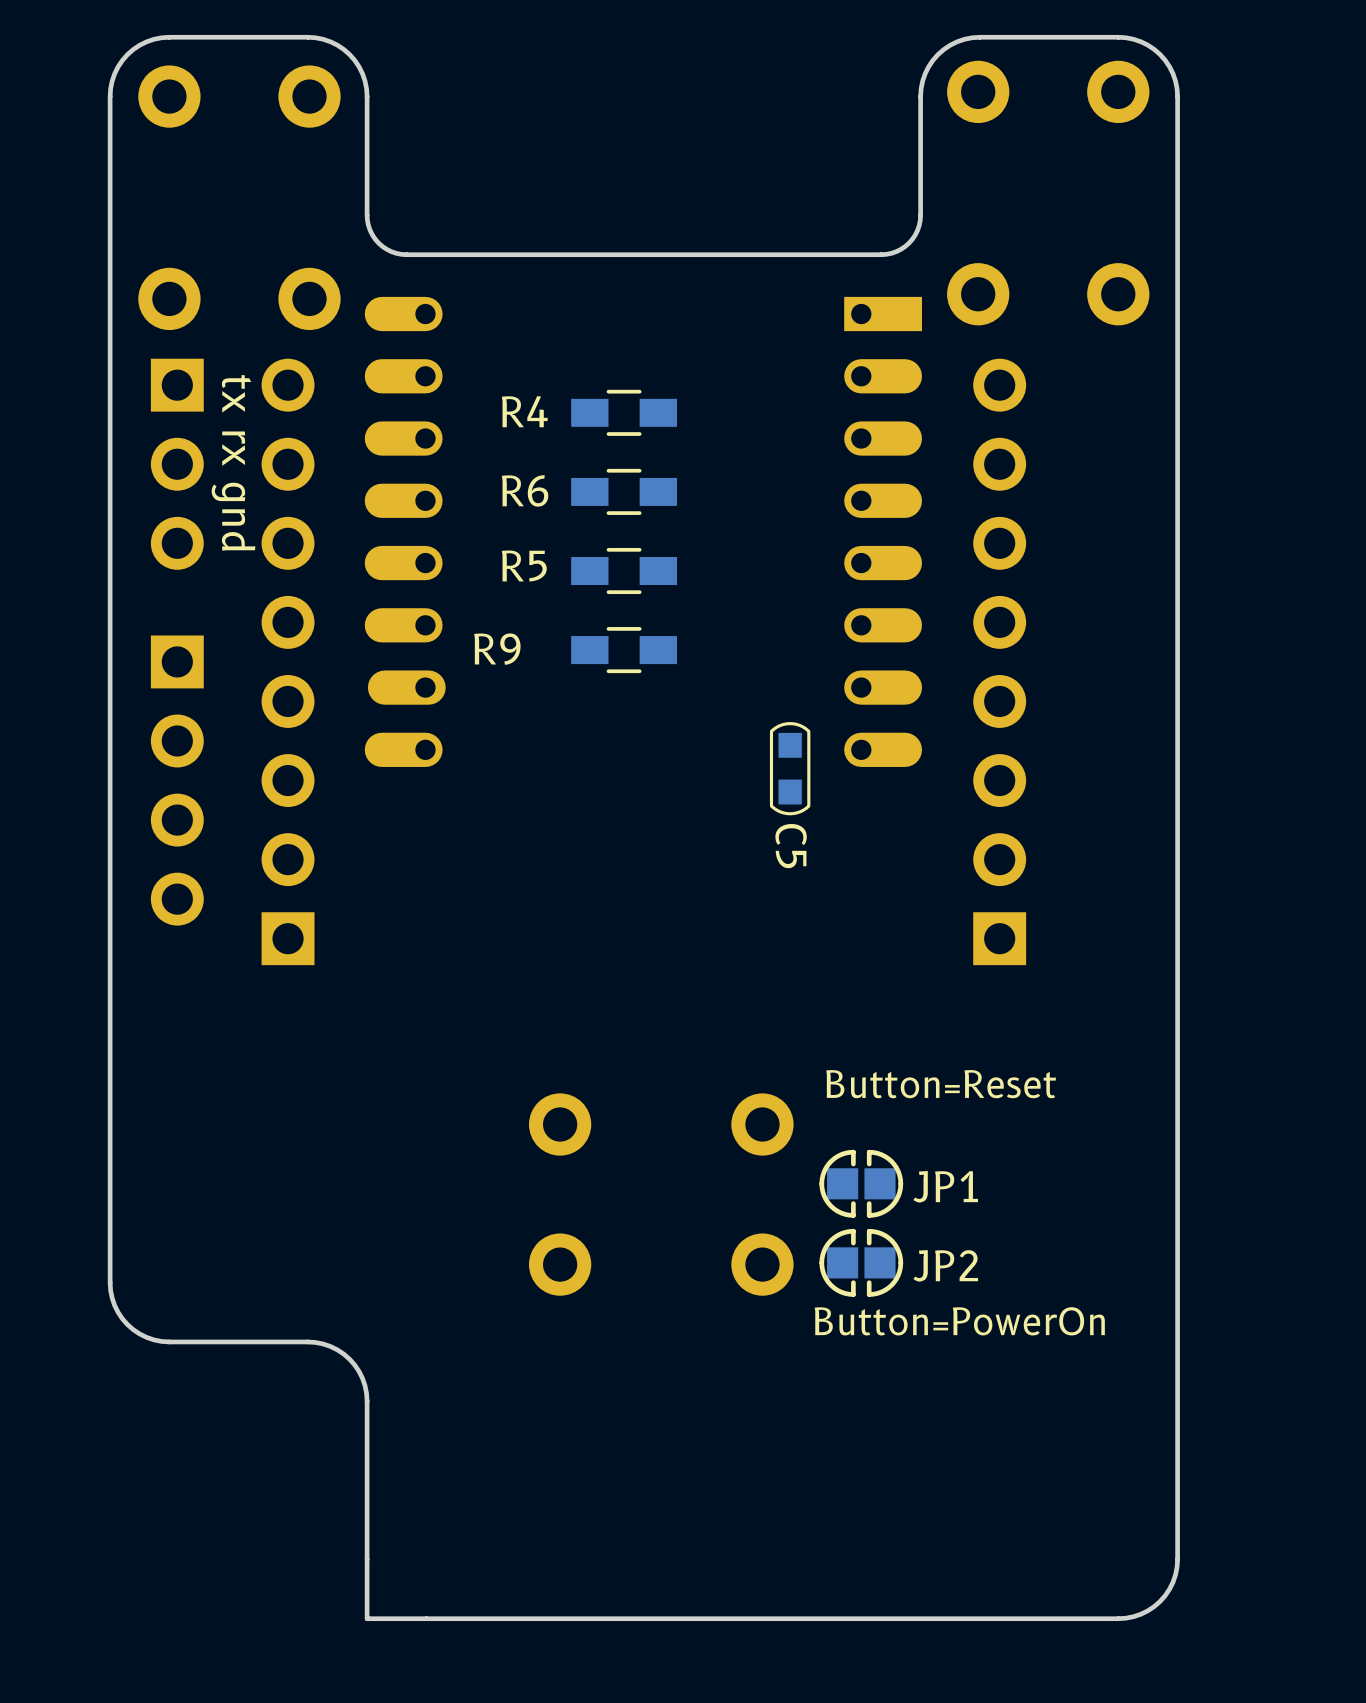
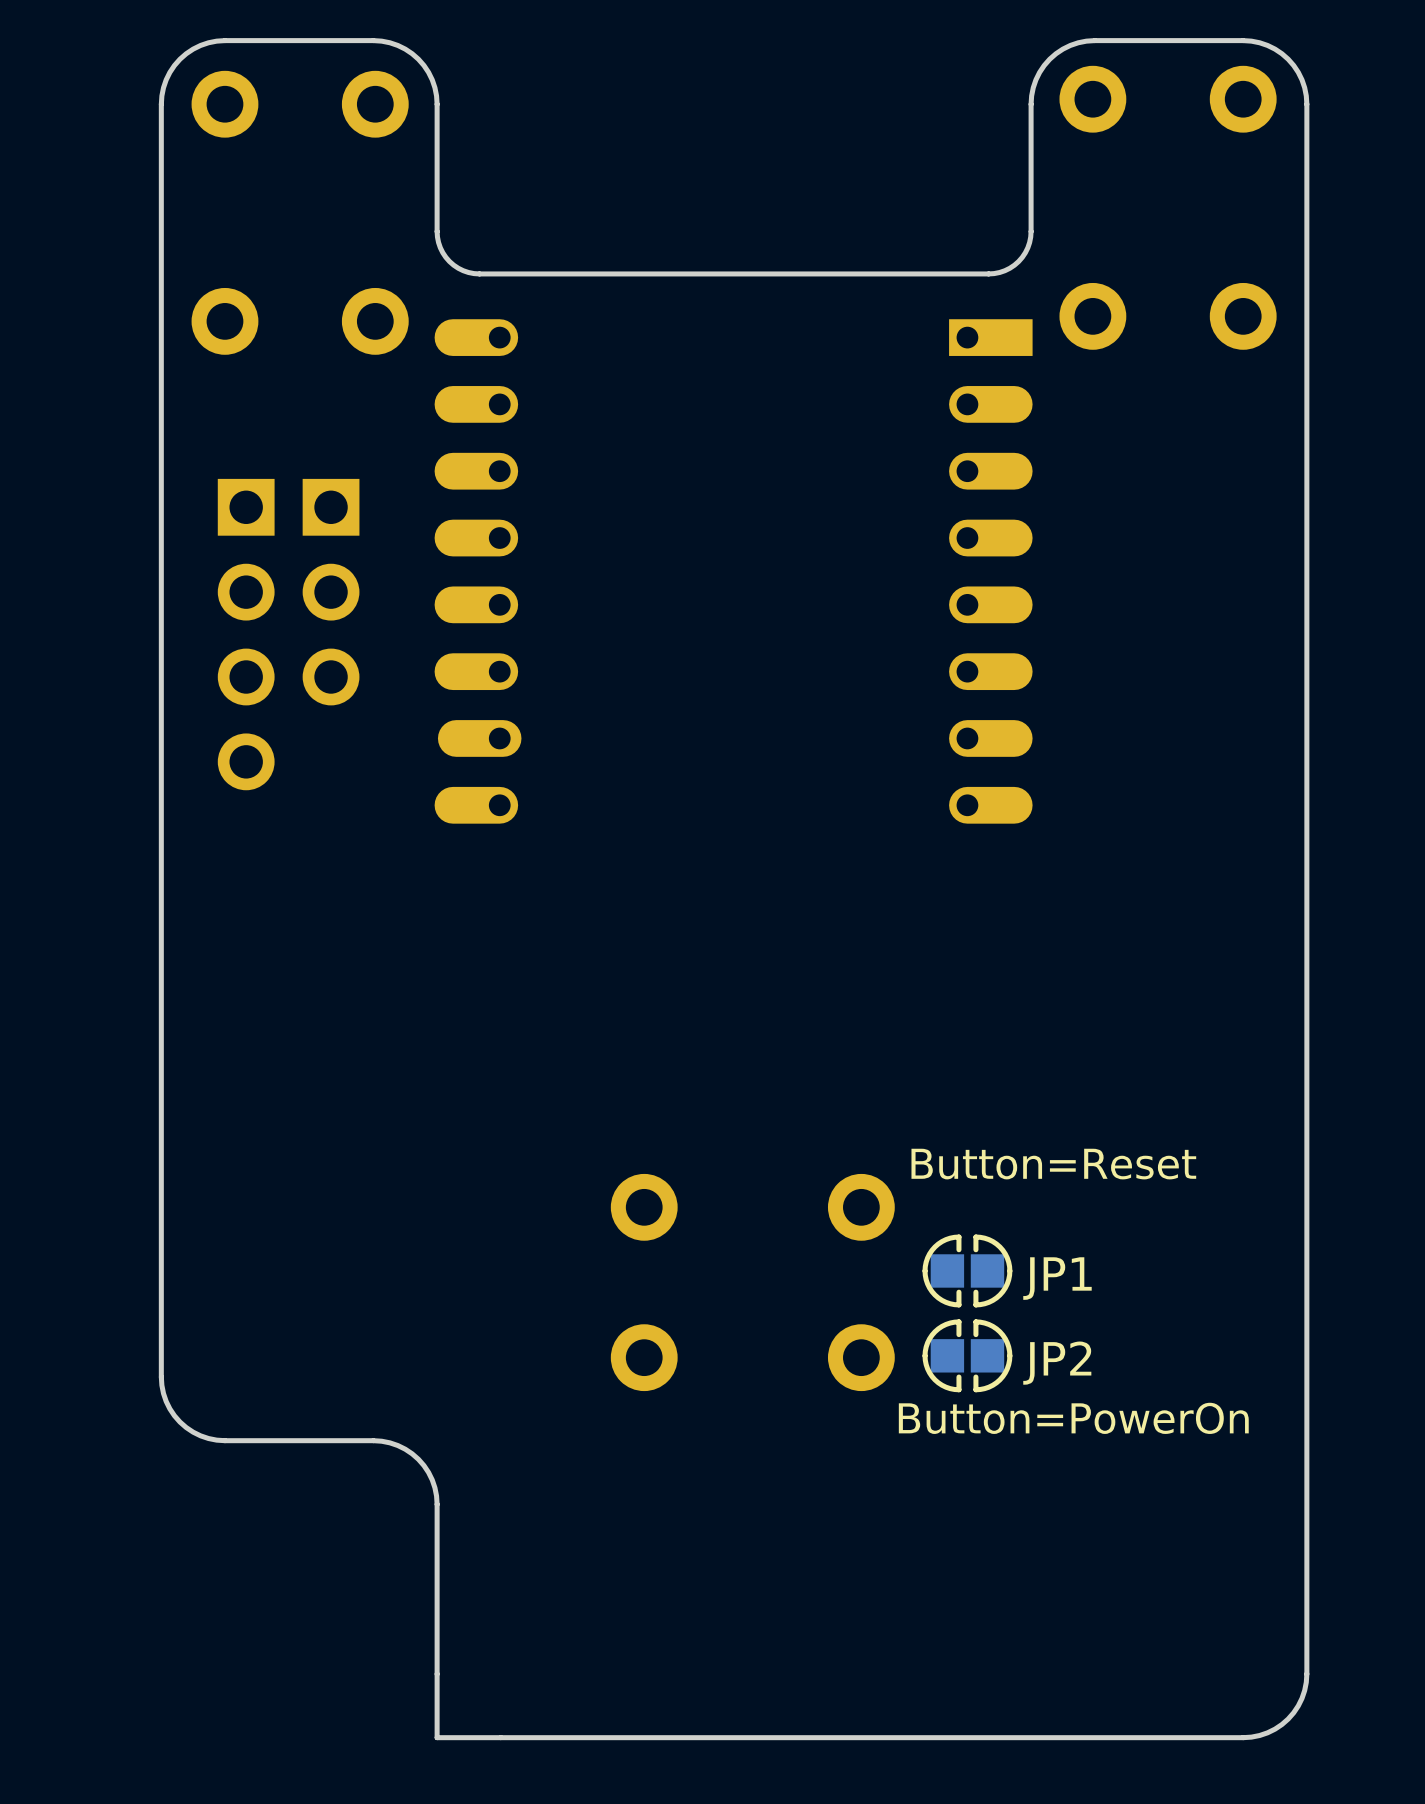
R4: (624, 412) -> none
text: tx rx gnd (233, 462) -> none
part position: (177, 464) -> (331, 592)
R6: (624, 491) -> none
R5: (624, 571) -> none
R9: (624, 650) -> none
part: (288, 661) -> none
part: (999, 661) -> none
C5: (790, 768) -> none
part position: (177, 780) -> (246, 634)

